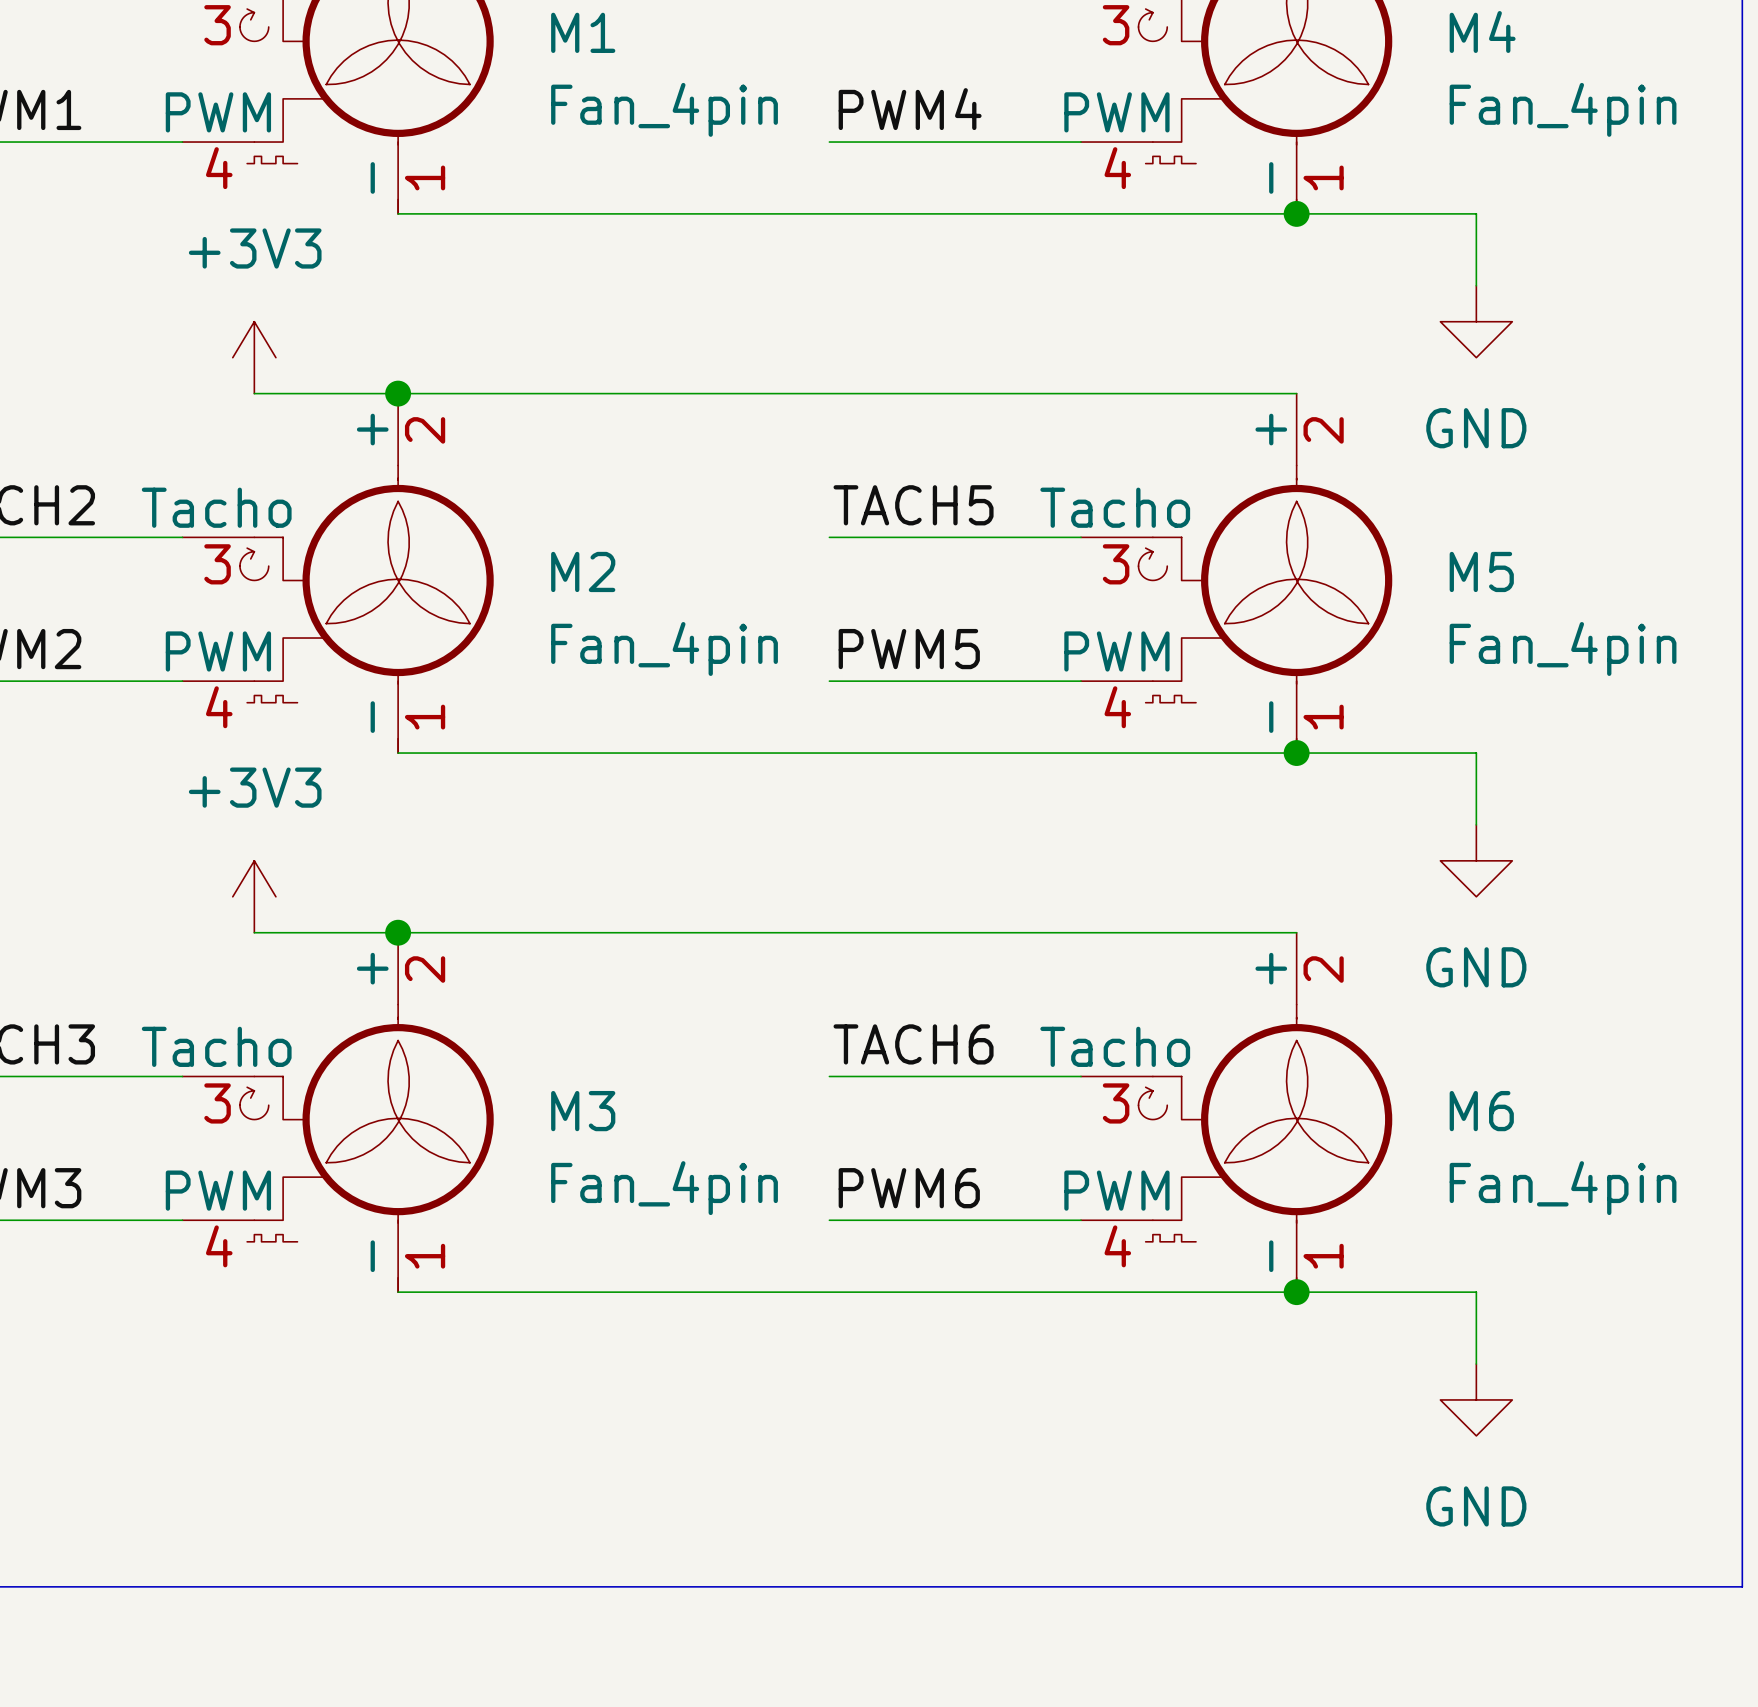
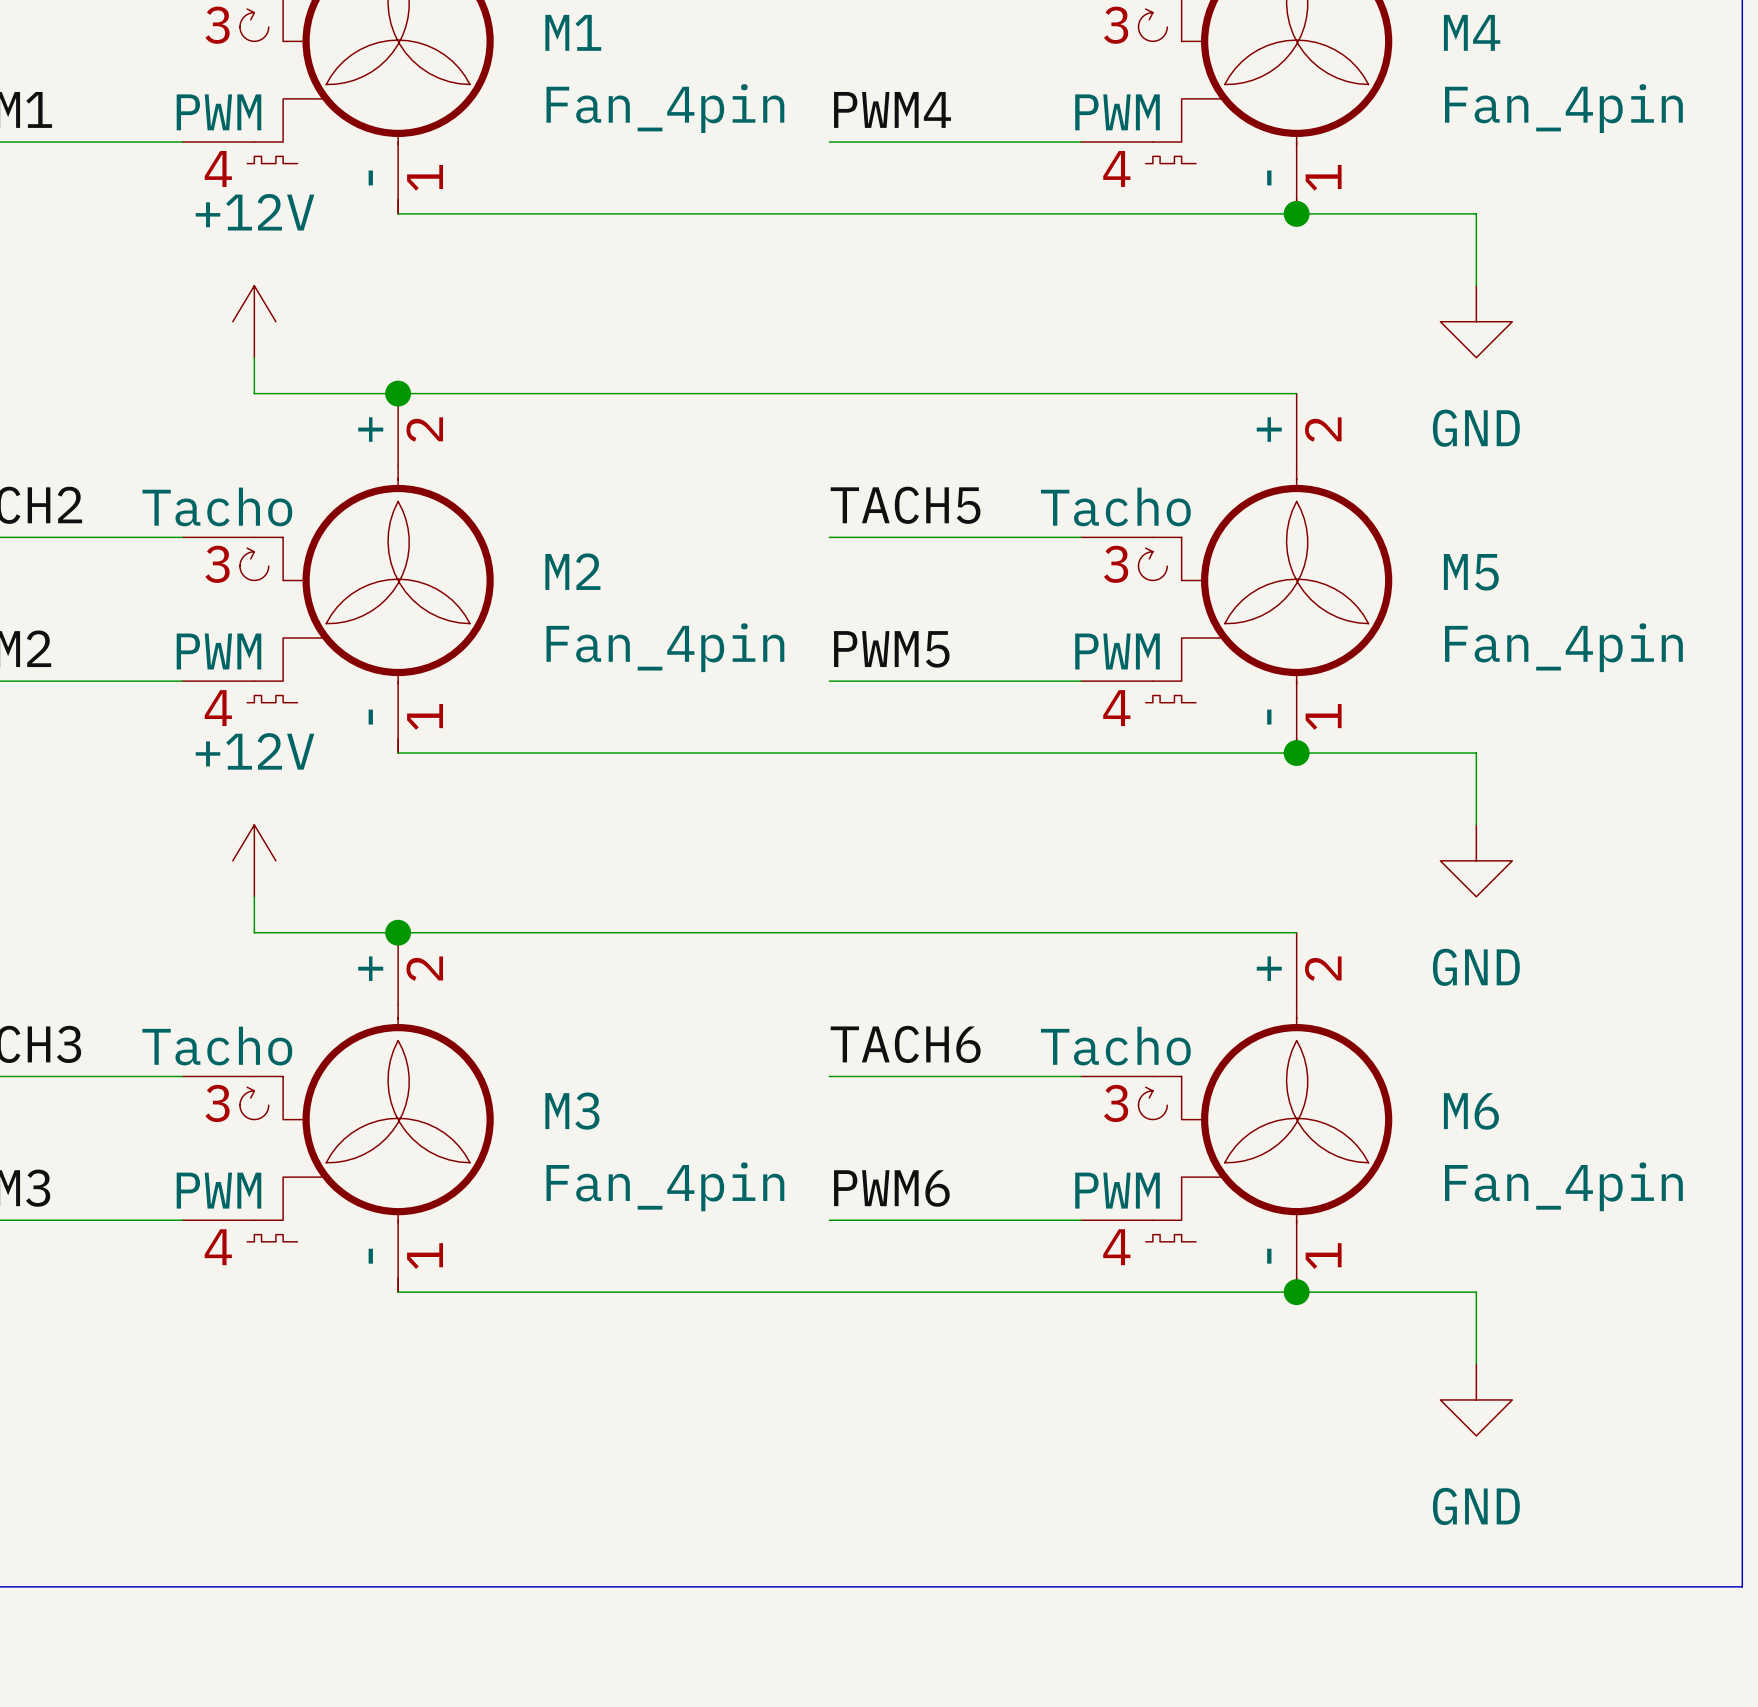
power symbol: none -> +12V (254, 321)
power symbol: +3V3 (254, 357) -> none
power symbol: none -> +12V (254, 860)
power symbol: +3V3 (254, 896) -> none

